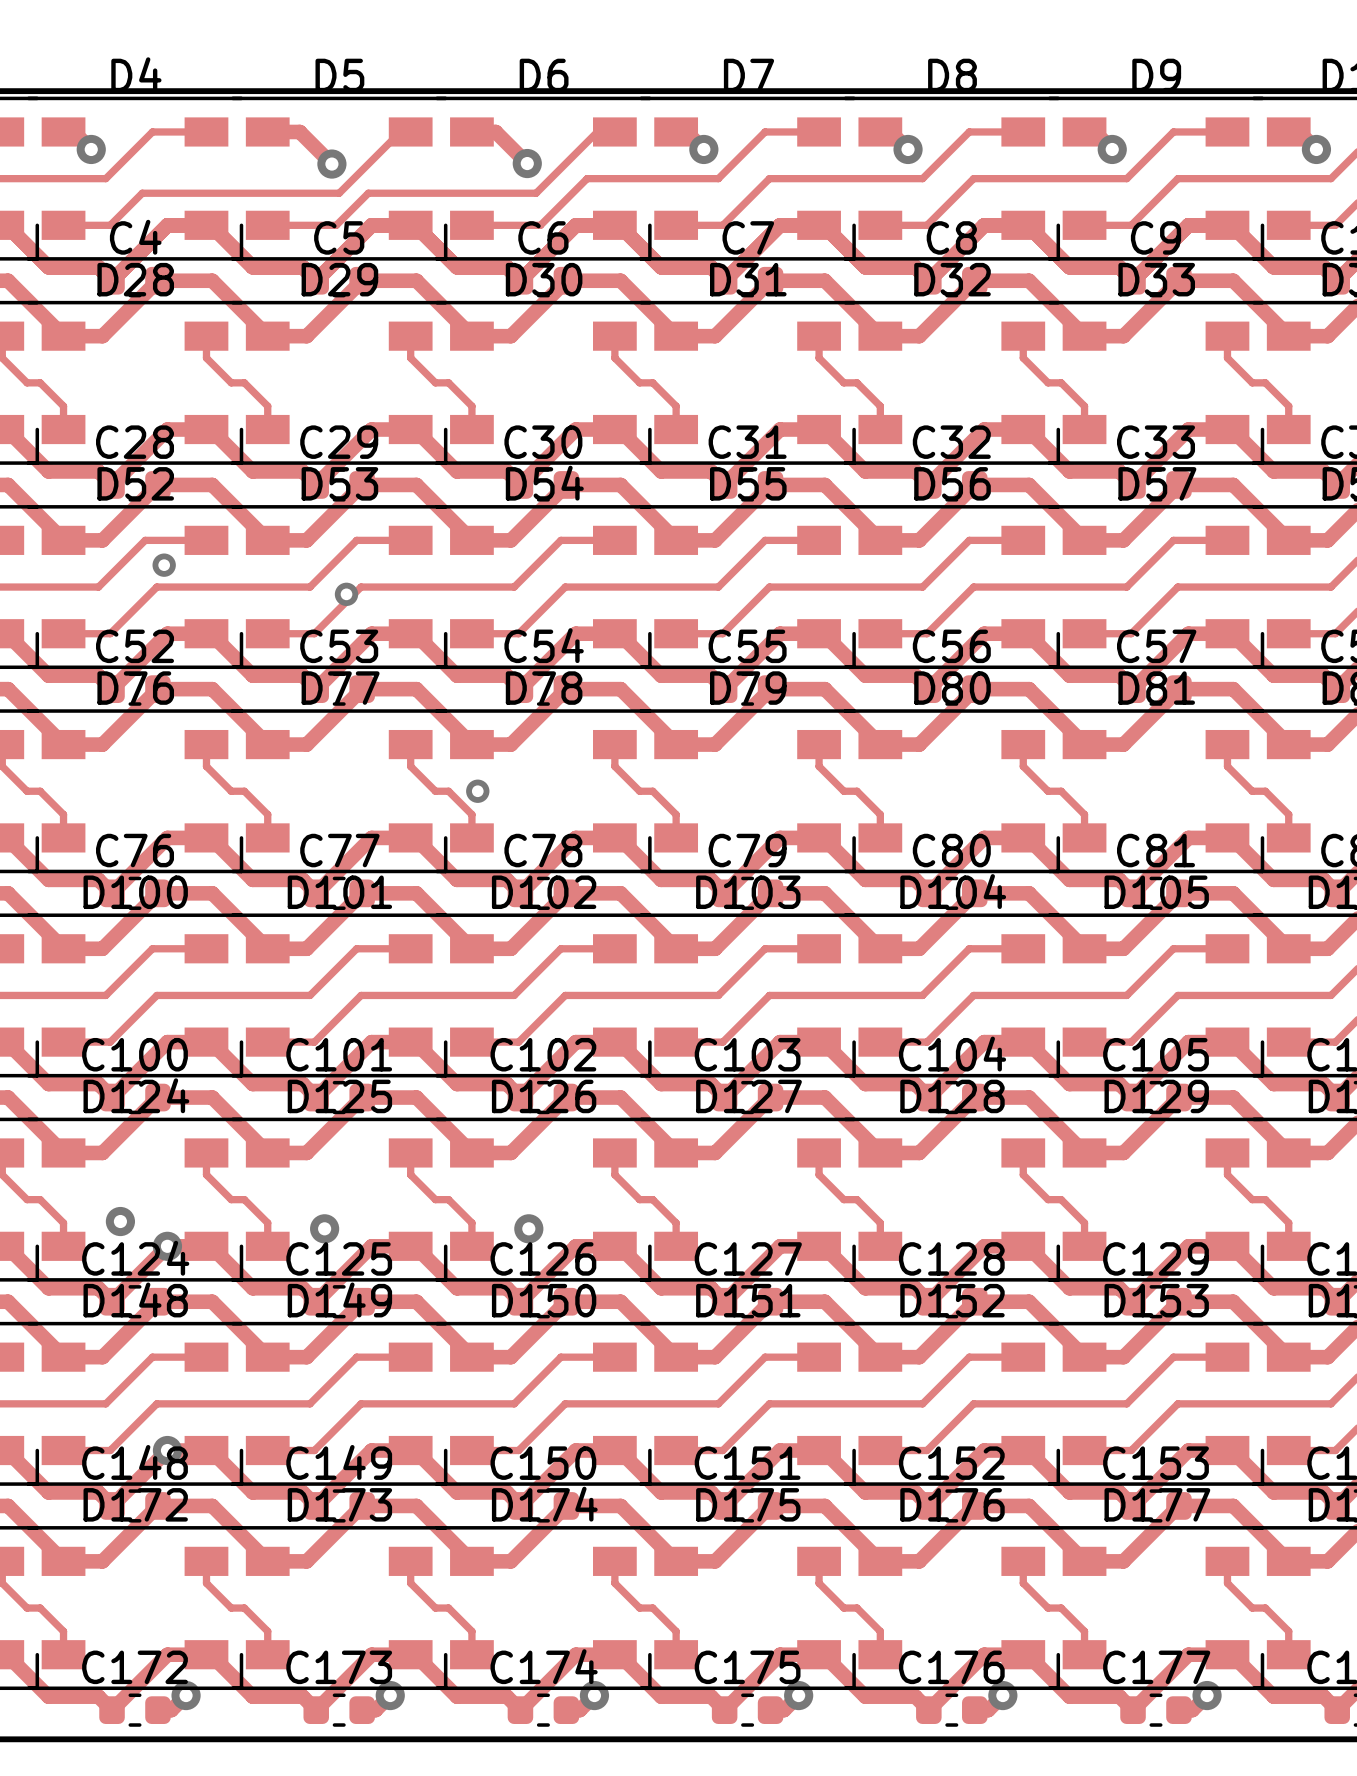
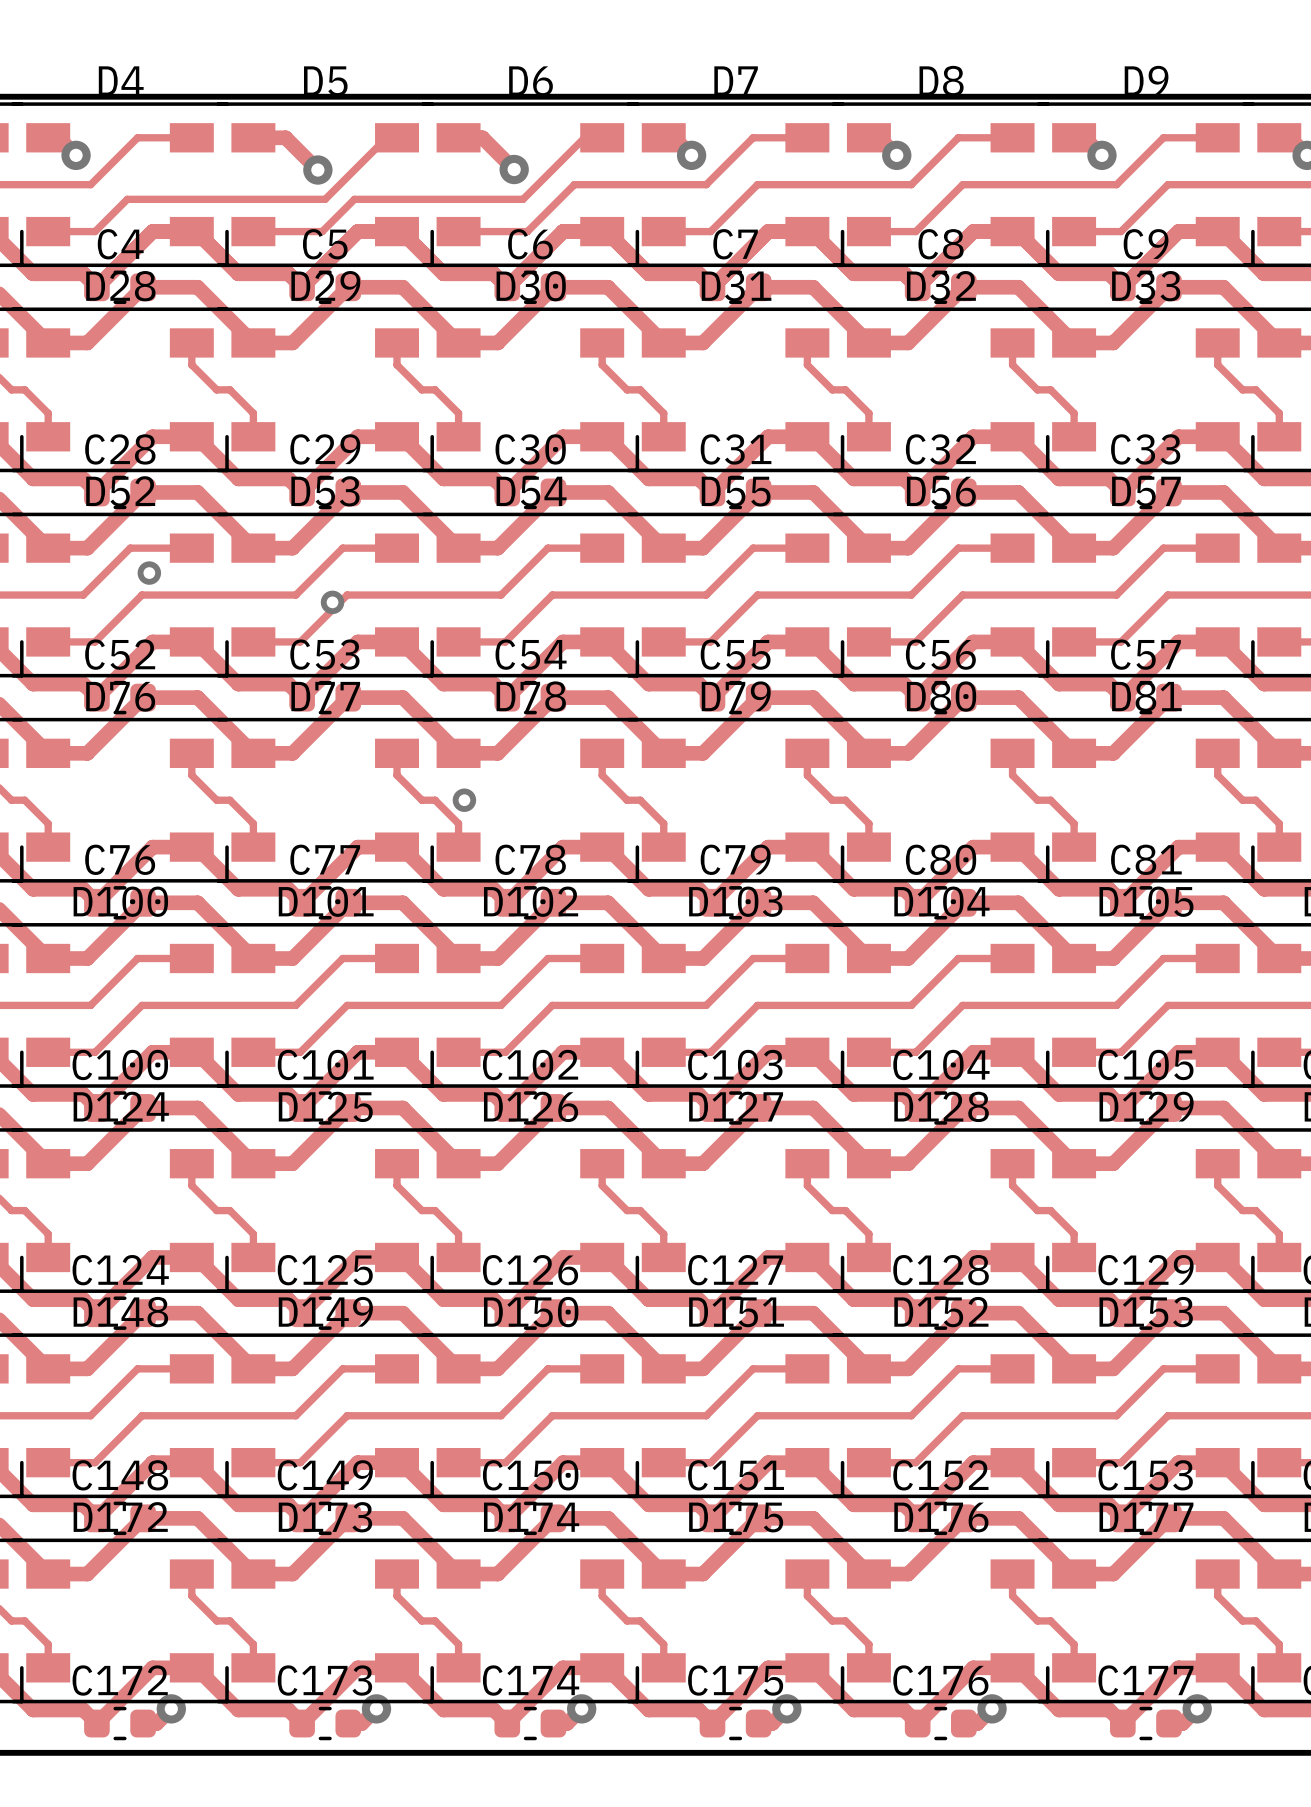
via: (120, 1221) -> none
via: (324, 1228) -> none
via: (528, 1228) -> none
via: (167, 1246) -> none
via: (167, 1450) -> none

